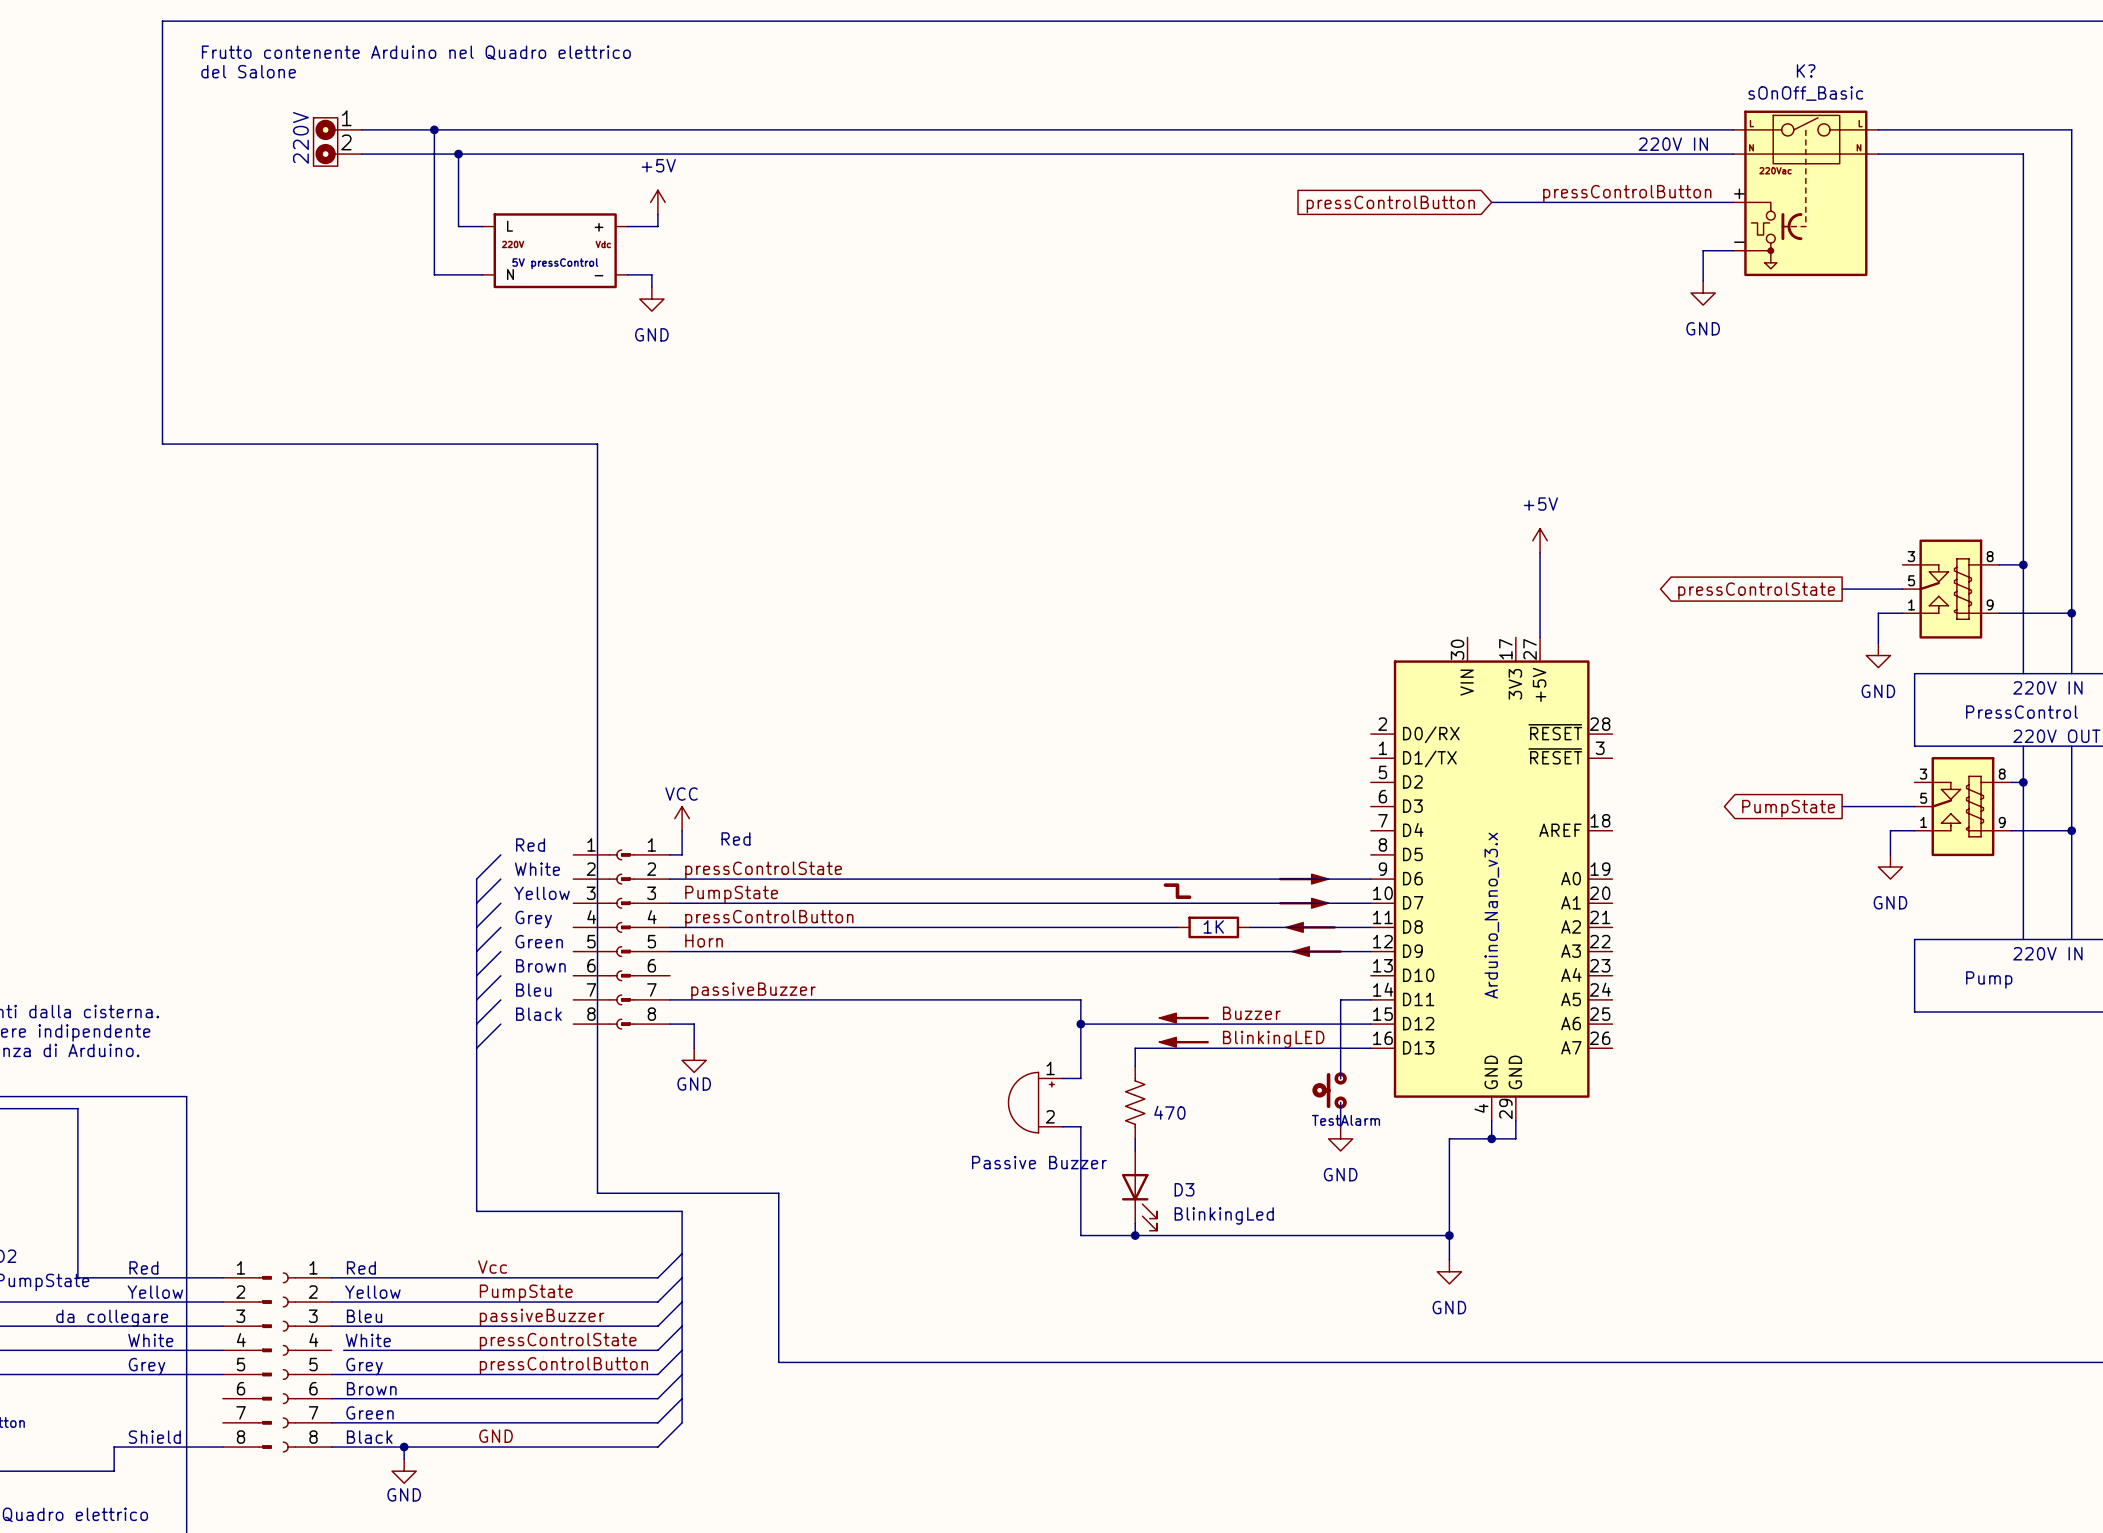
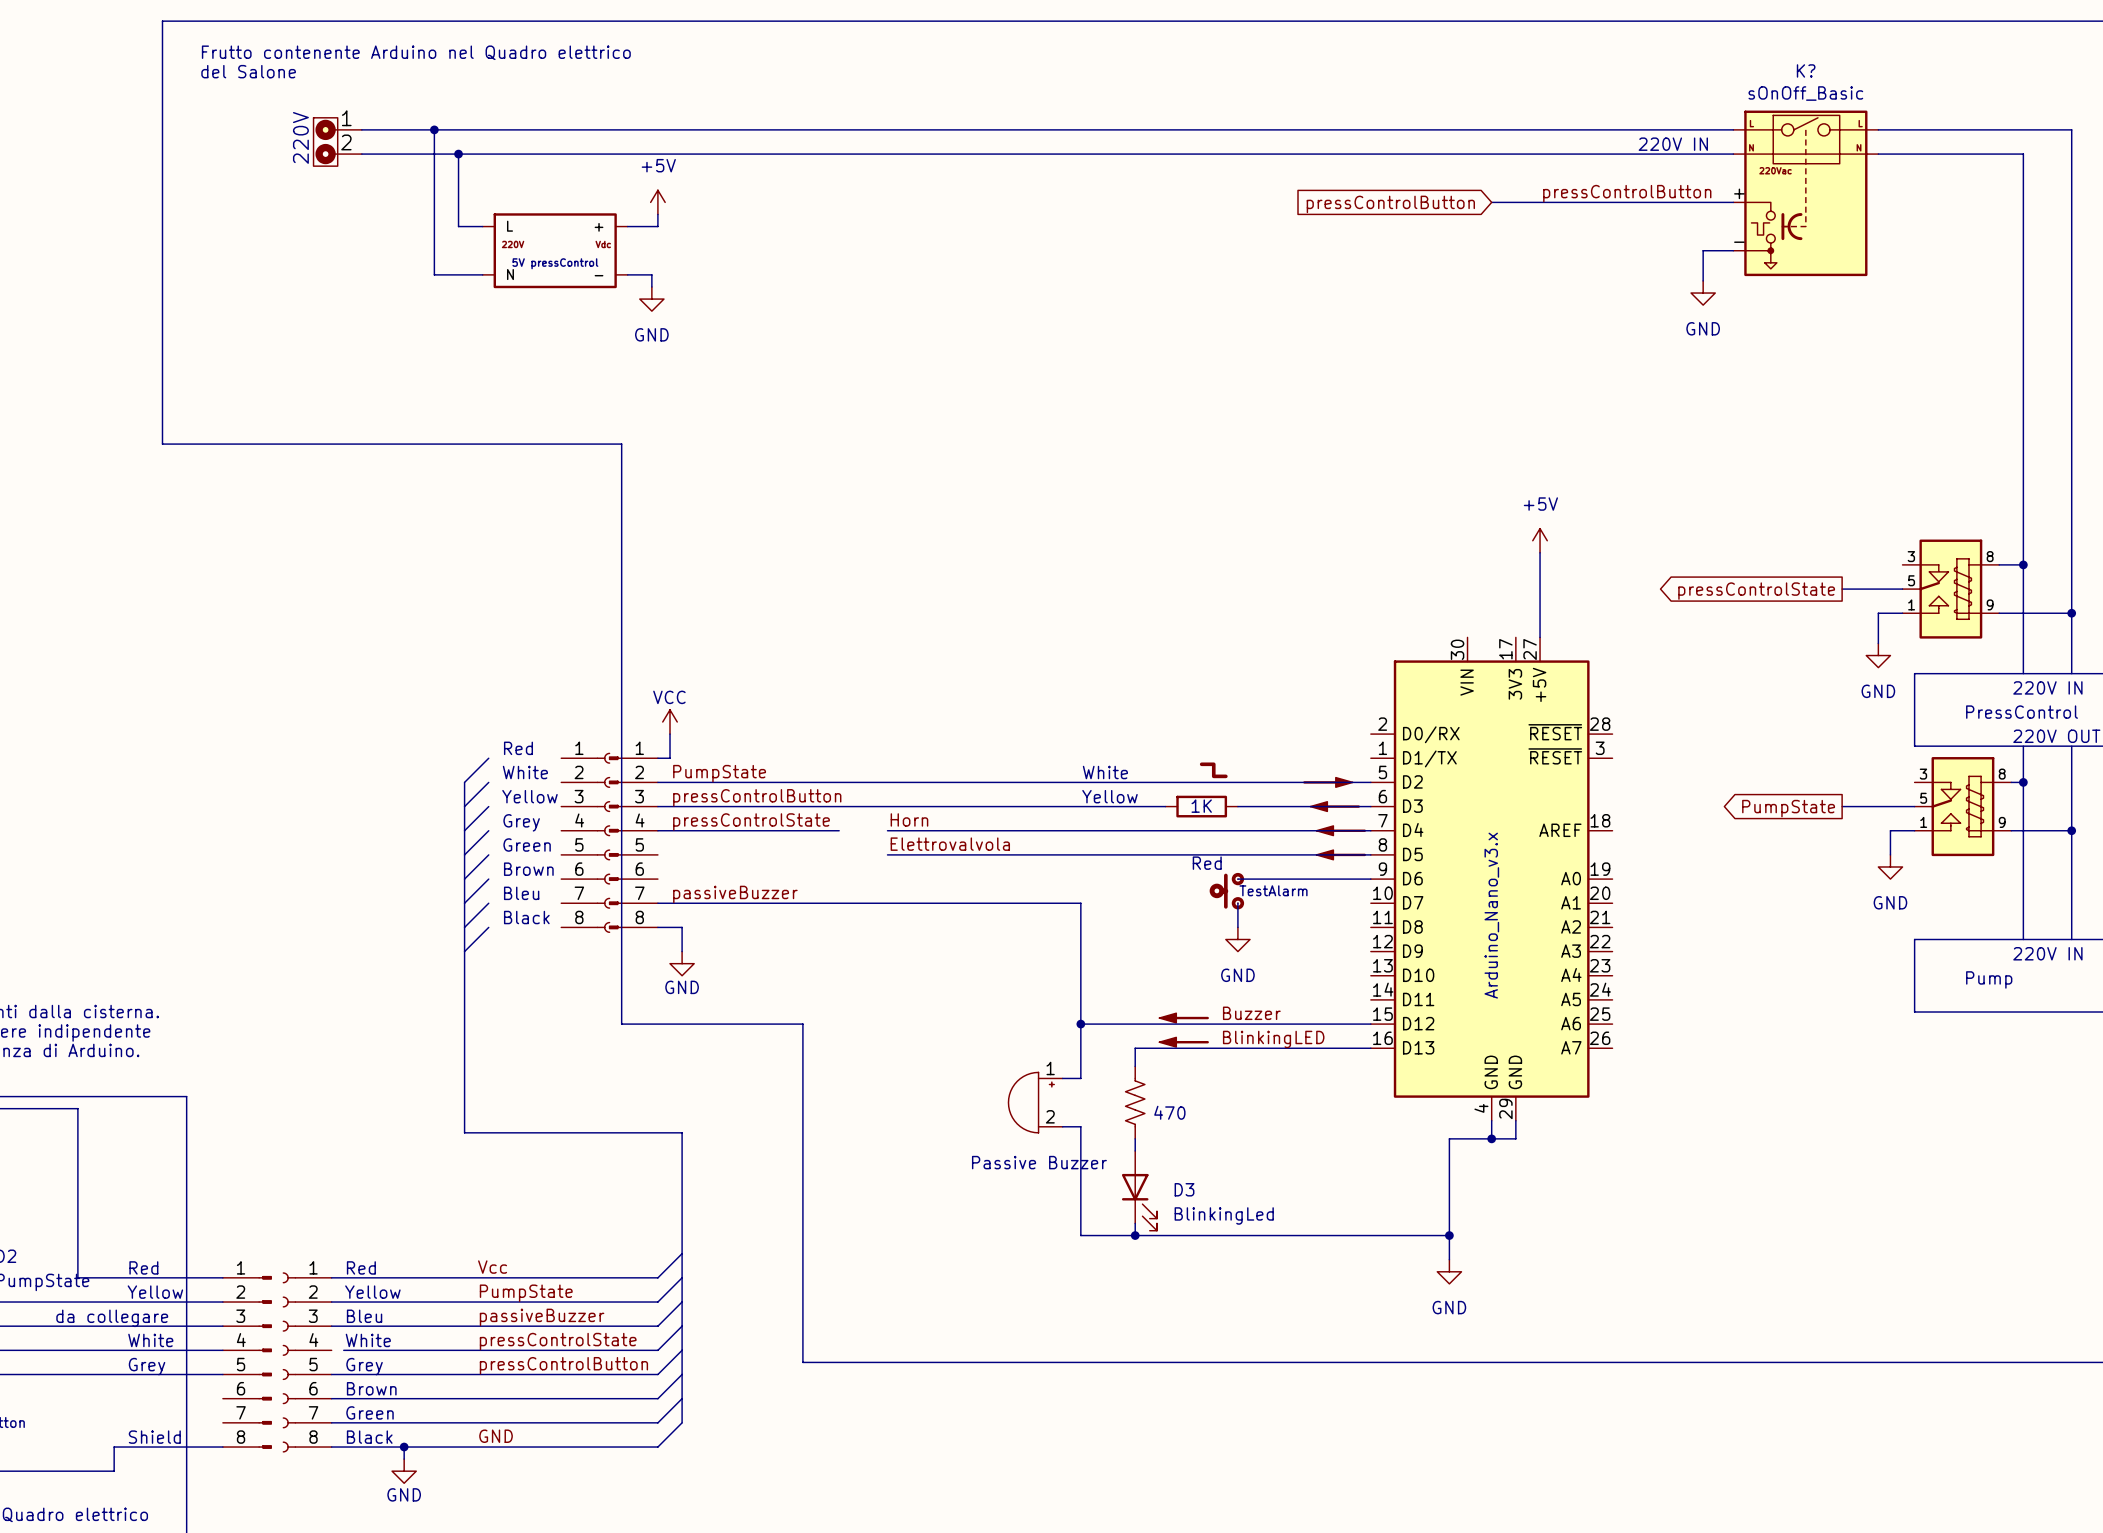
wire: (597, 444) (597, 1193) (778, 1193) (778, 1362) (802, 1362) -> (597, 444) (621, 444) (621, 1024) (670, 1024)
text: none -> White (1105, 772)
wire: none -> (657, 782) (1370, 782)
power symbol: none -> (1327, 782)
text: none -> Yellow (1109, 796)
wire: none -> (657, 806) (1165, 806)
wire: none -> (1237, 806) (1370, 806)
power symbol: none -> (1335, 806)
power symbol position: VCC (682, 818) -> VCC (670, 721)
label: none -> Horn (909, 819)
wire: none -> (657, 830) (839, 830)
wire: (682, 830) (682, 854) (670, 854) -> (670, 734) (670, 758) (657, 758)
wire: none -> (887, 830) (1370, 830)
power symbol: none -> (1341, 830)
text: Red (735, 838) -> none
label: none -> Elettrovalvola (950, 844)
text position: Red (530, 845) -> Red (518, 748)
wire: (500, 854) (476, 879) -> (488, 758) (464, 782)
wire: none -> (887, 854) (1370, 854)
power symbol: none -> (1341, 854)
text: none -> Red (1207, 863)
text position: White (537, 869) -> White (525, 772)
label position: pressControlState (763, 870) -> pressControlState (751, 821)
bus: (476, 879) (476, 1211) (682, 1211) -> (464, 782) (464, 1132) (682, 1132) (682, 1211)
wire: (500, 879) (476, 903) -> (488, 782) (464, 806)
wire: (670, 879) (1237, 879) -> none
power symbol: (1303, 879) -> none
part position: (1177, 891) -> (1213, 770)
text position: Yellow (542, 893) -> Yellow (529, 796)
label position: PumpState (731, 894) -> PumpState (719, 773)
wire: (500, 903) (476, 927) -> (488, 806) (464, 830)
wire: (1080, 903) (1370, 903) -> (1080, 903) (1080, 999)
power symbol: (1303, 903) -> none
label position: pressControlButton (769, 918) -> pressControlButton (757, 797)
text position: Grey (533, 919) -> Grey (521, 822)
wire: (500, 927) (476, 951) -> (488, 830) (464, 854)
wire: (682, 927) (1177, 927) -> (682, 927) (682, 951)
part position: (1213, 927) -> (1201, 806)
wire: (1250, 927) (1370, 927) -> none
power symbol: (1311, 927) -> none
part position: (597, 939) -> (585, 842)
part position: (645, 939) -> (633, 842)
label: Horn (704, 940) -> none
text position: Green (539, 941) -> Green (527, 845)
wire: (500, 951) (476, 975) -> (488, 854) (464, 879)
wire: (670, 951) (1370, 951) -> none
power symbol: (1317, 951) -> none
text position: Brown (540, 965) -> Brown (528, 869)
wire: (500, 975) (476, 999) -> (488, 879) (464, 903)
text position: Bleu (533, 990) -> Bleu (521, 893)
label position: passiveBuzzer (753, 991) -> passiveBuzzer (735, 894)
wire: (500, 999) (476, 1024) -> (488, 903) (464, 927)
wire: (670, 999) (1080, 999) -> none
wire: (1370, 999) (1340, 999) (1340, 1078) -> none
text position: Black (538, 1014) -> Black (526, 917)
wire: (500, 1024) (476, 1048) -> (488, 927) (464, 951)
wire: (694, 1024) (694, 1048) -> (694, 1024) (802, 1024) (802, 1362)
power symbol position: GND (694, 1060) -> GND (682, 963)
part position: (1329, 1090) -> (1226, 891)
wire: (1340, 1102) (1340, 1126) -> (1237, 903) (1237, 927)
part value position: TestAlarm (1345, 1120) -> TestAlarm (1273, 890)
power symbol position: GND (1340, 1138) -> GND (1237, 939)

